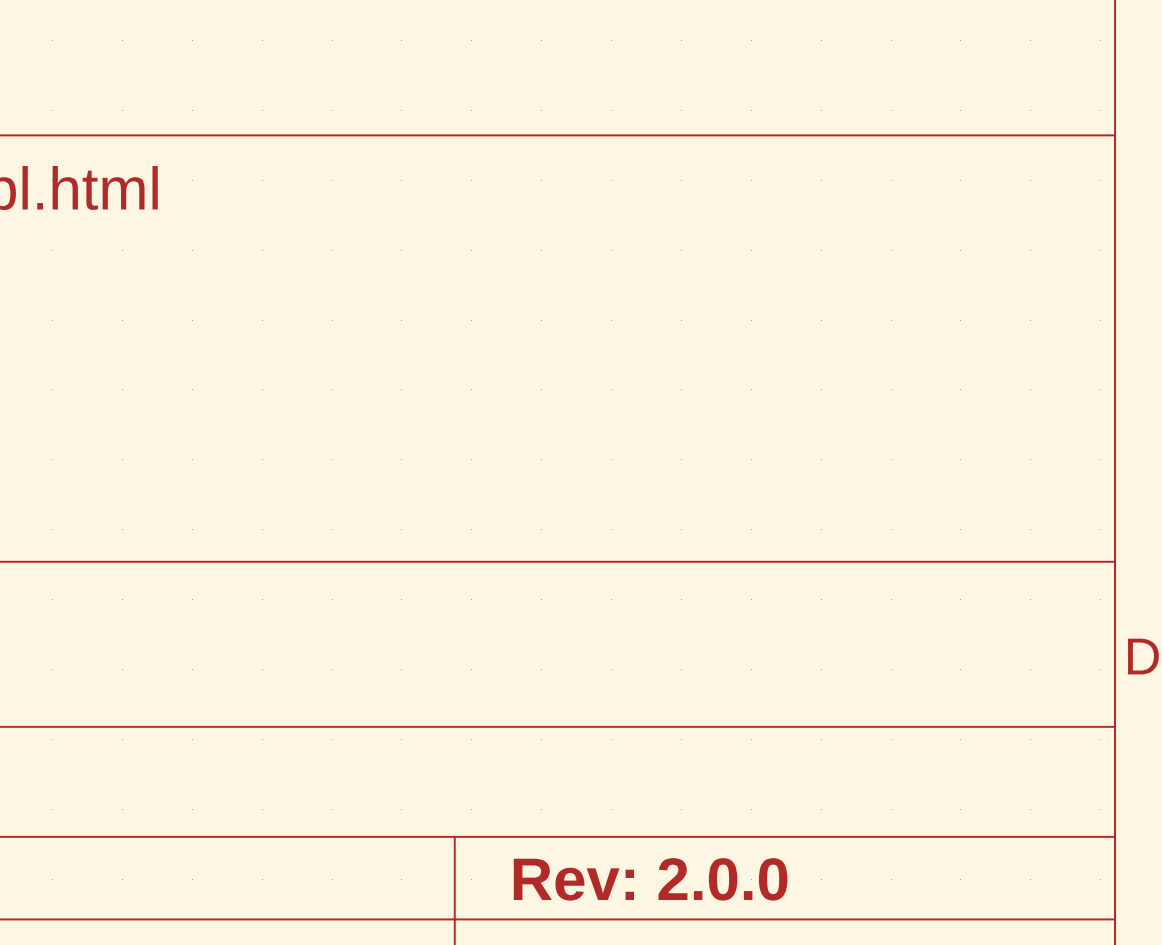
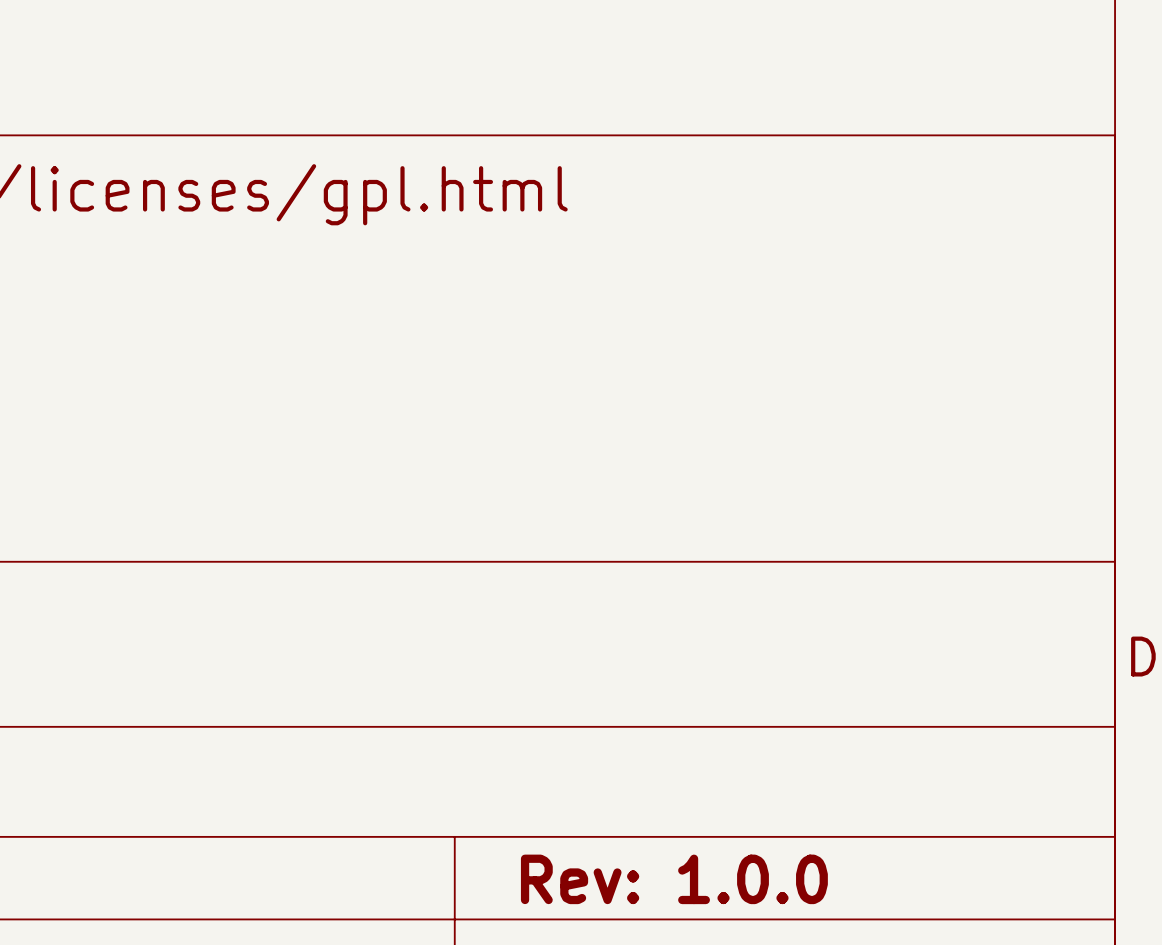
title block: Rev: 2.0.0 (650, 879) -> Rev: 1.0.0 (674, 879)

